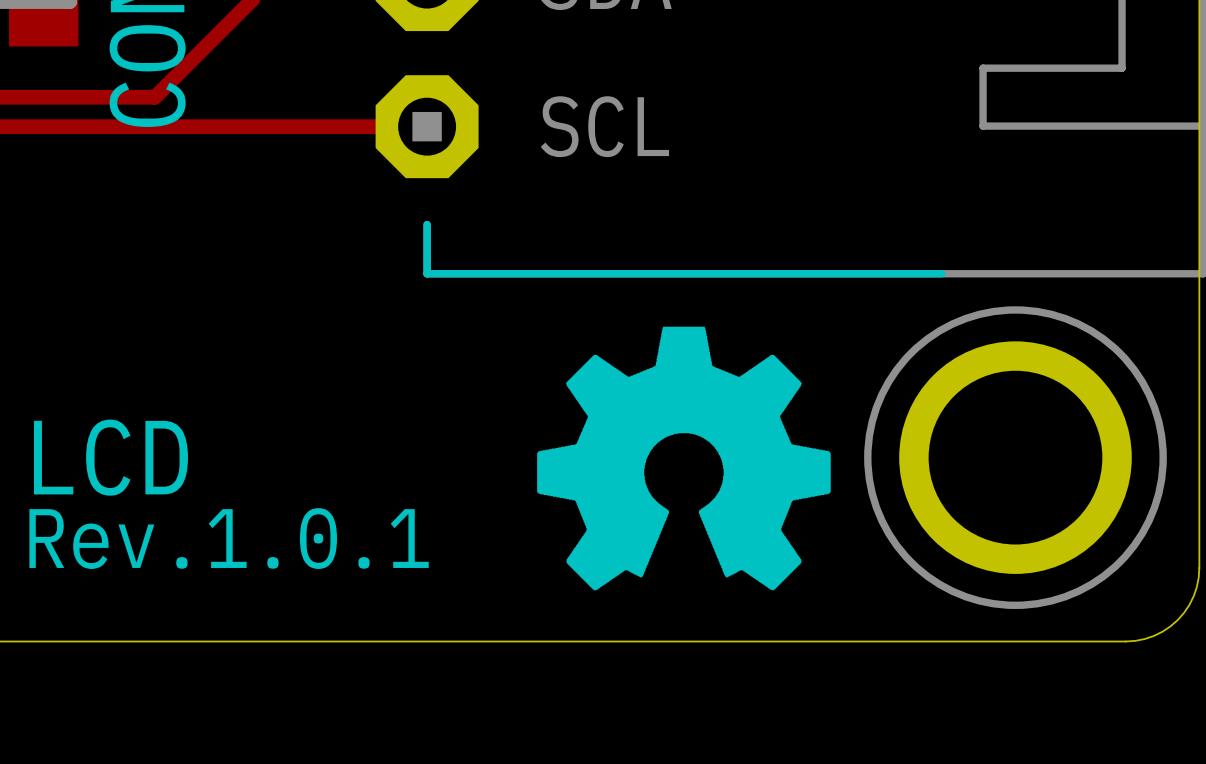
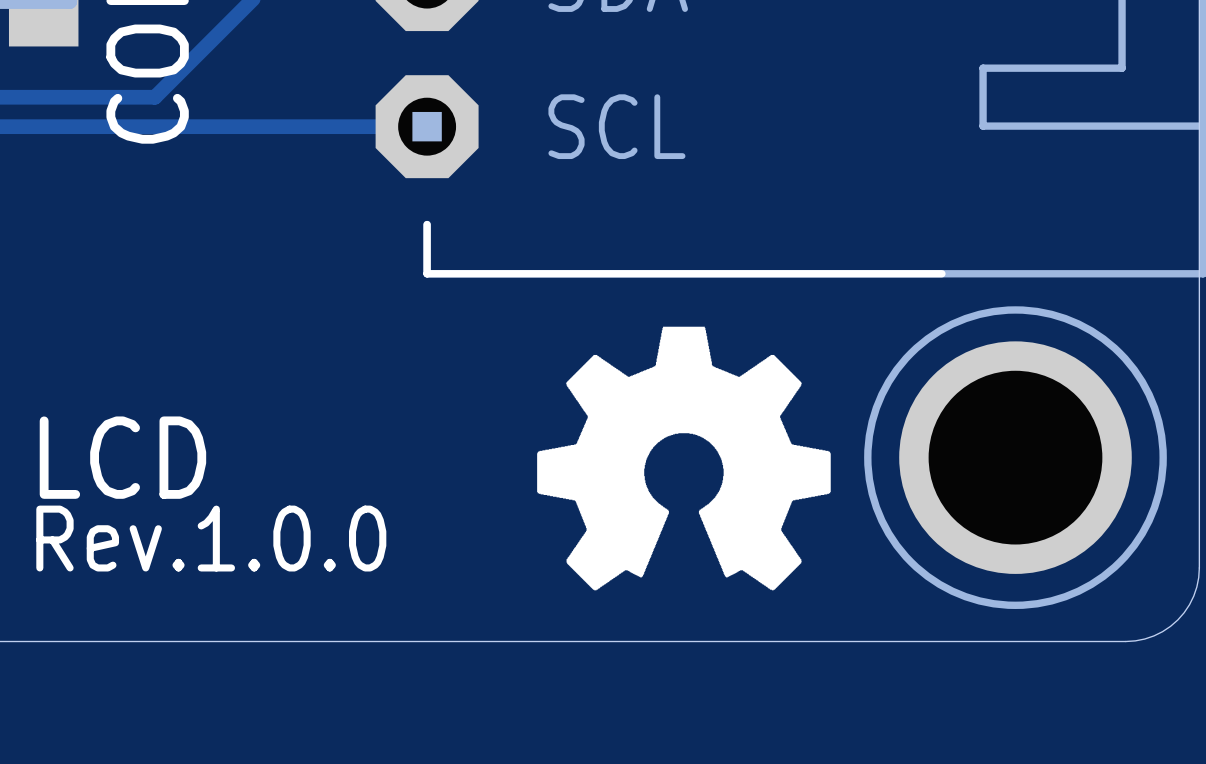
text: Rev.1.0.1 (229, 538) -> Rev.1.0.0 (211, 538)

